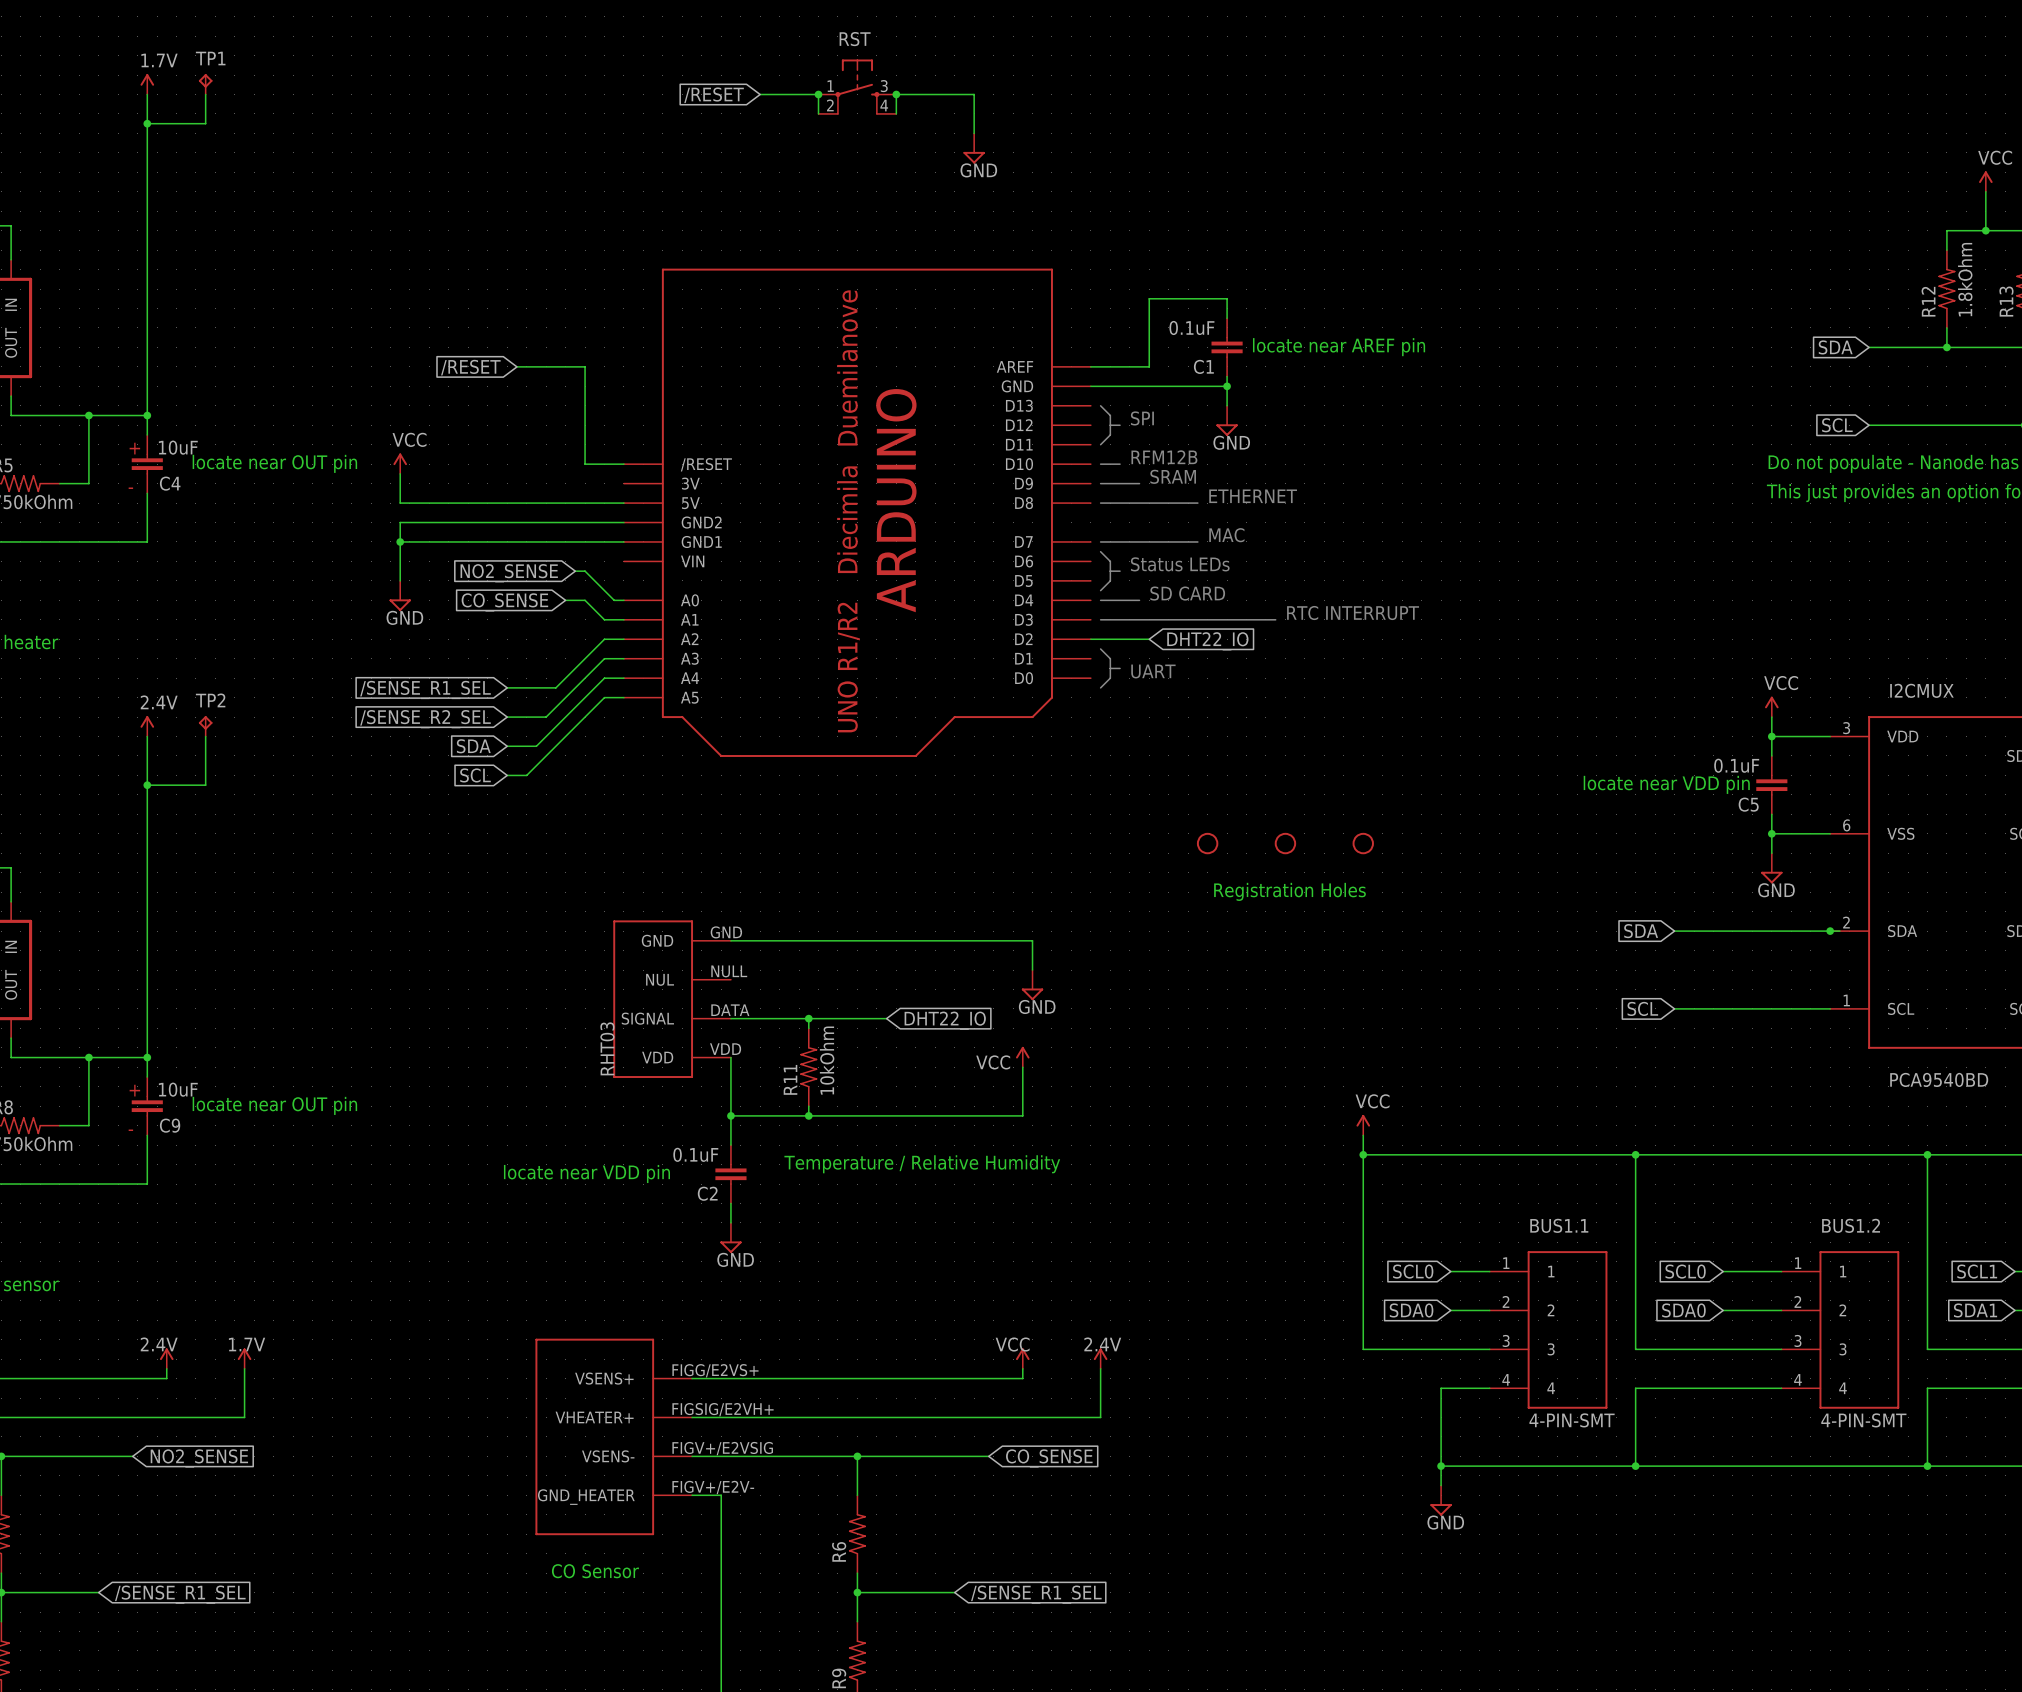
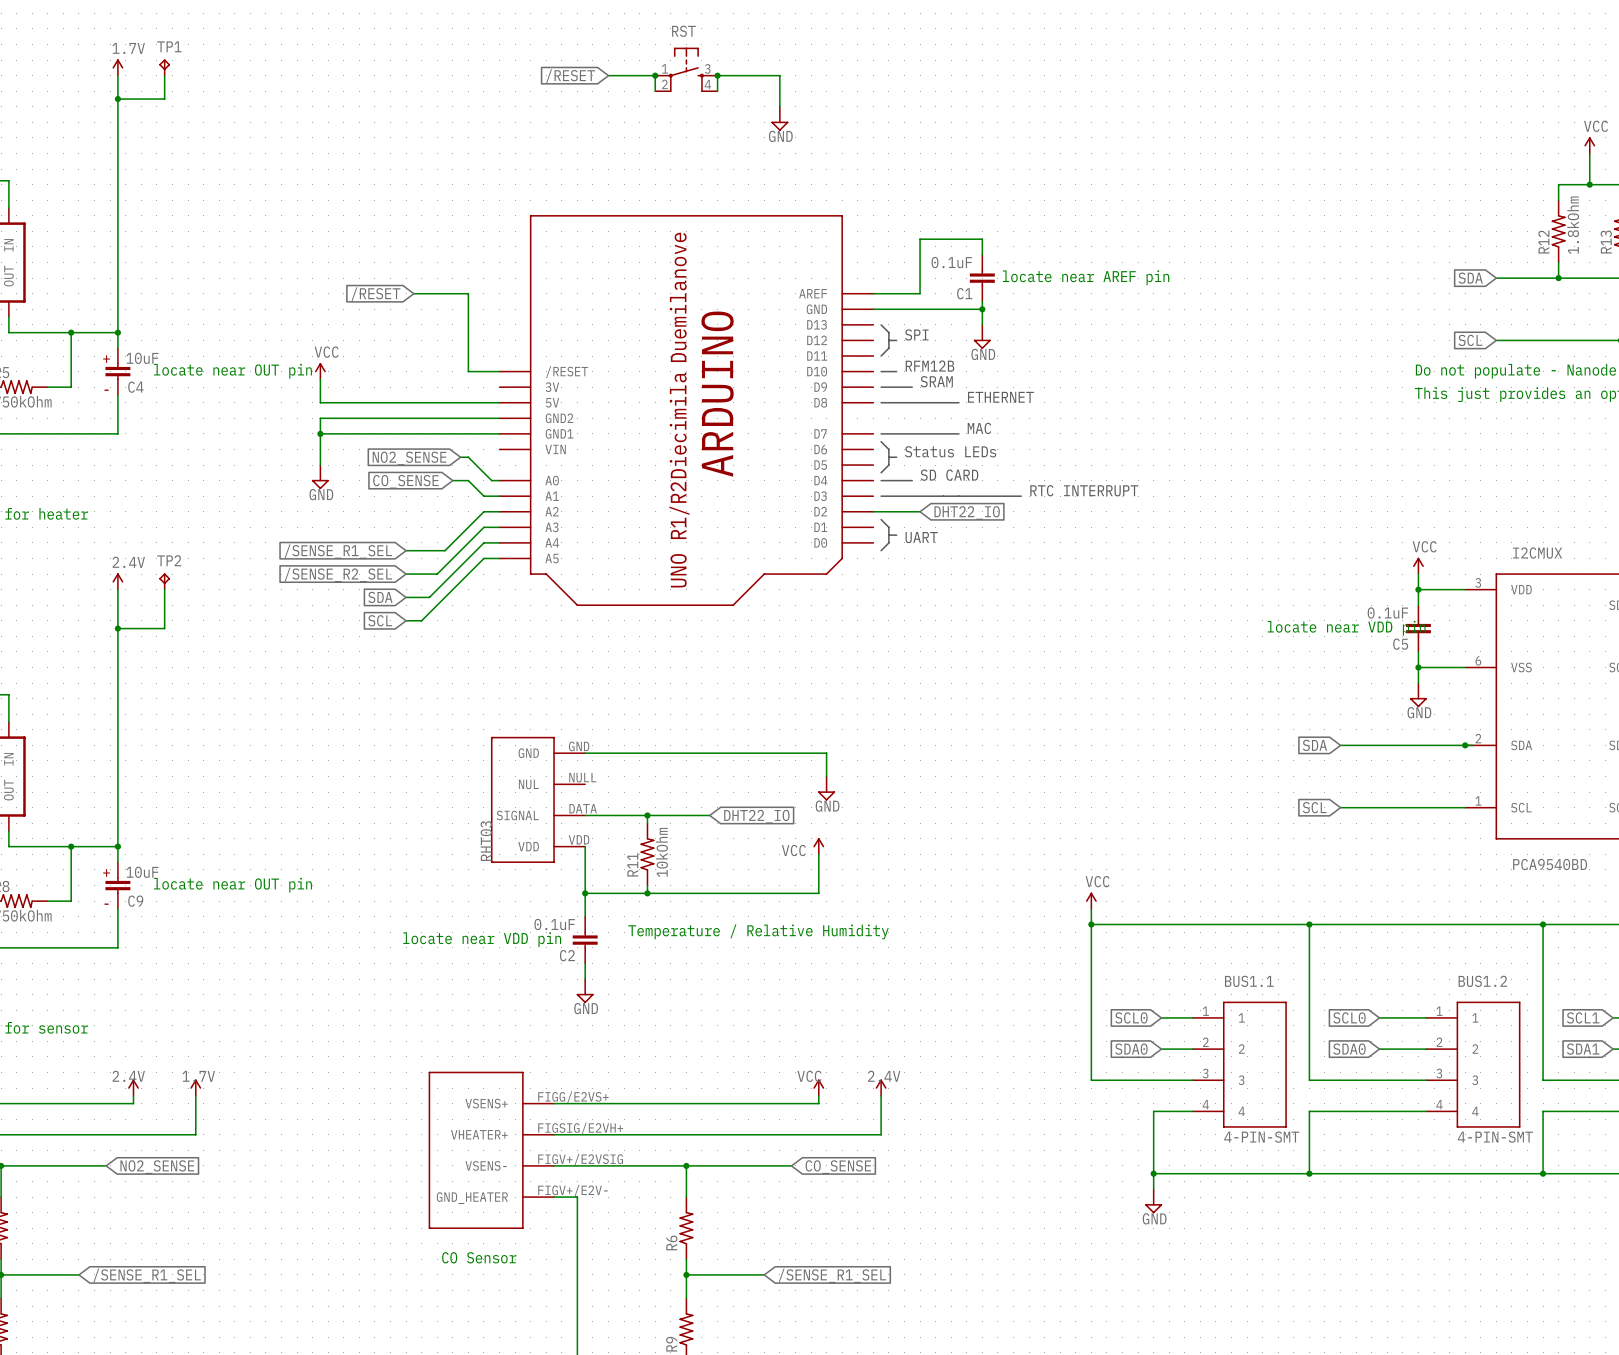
part: (1207, 843) -> none
part: (1285, 843) -> none
part: (1363, 843) -> none
text: Registration Holes (1289, 891) -> none

